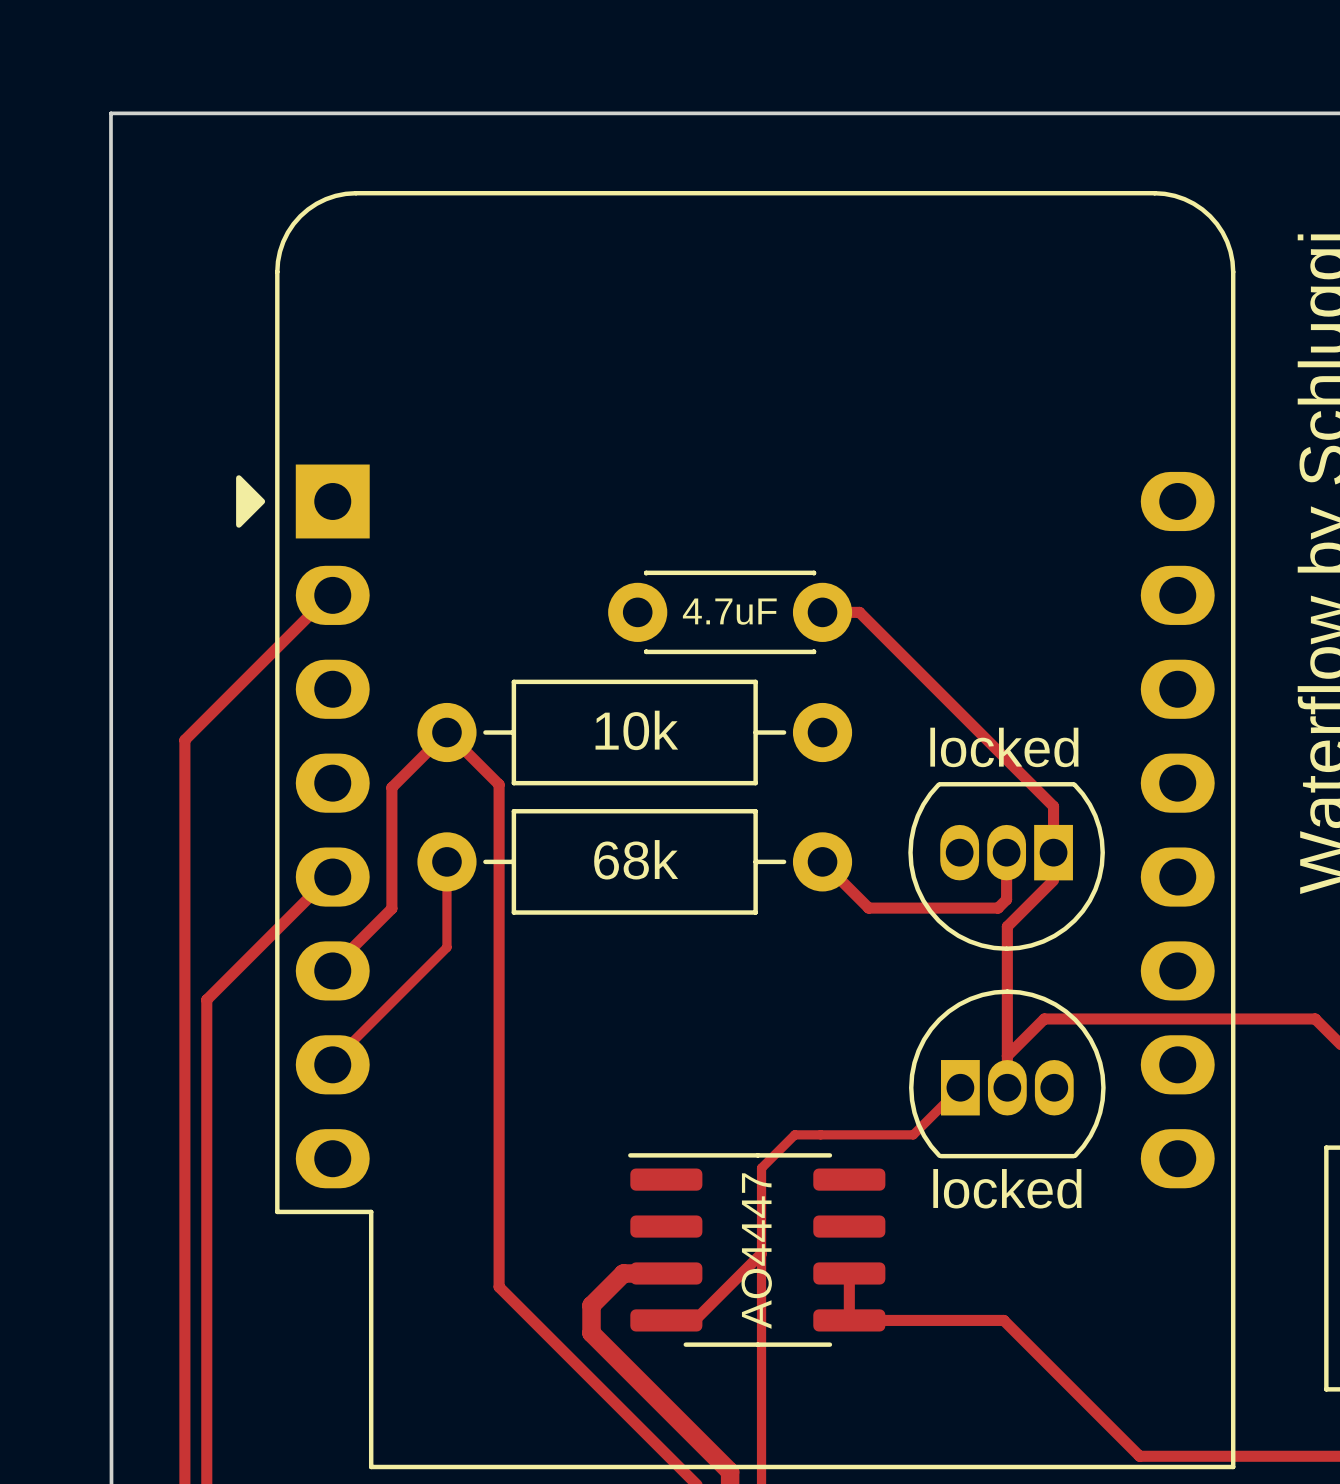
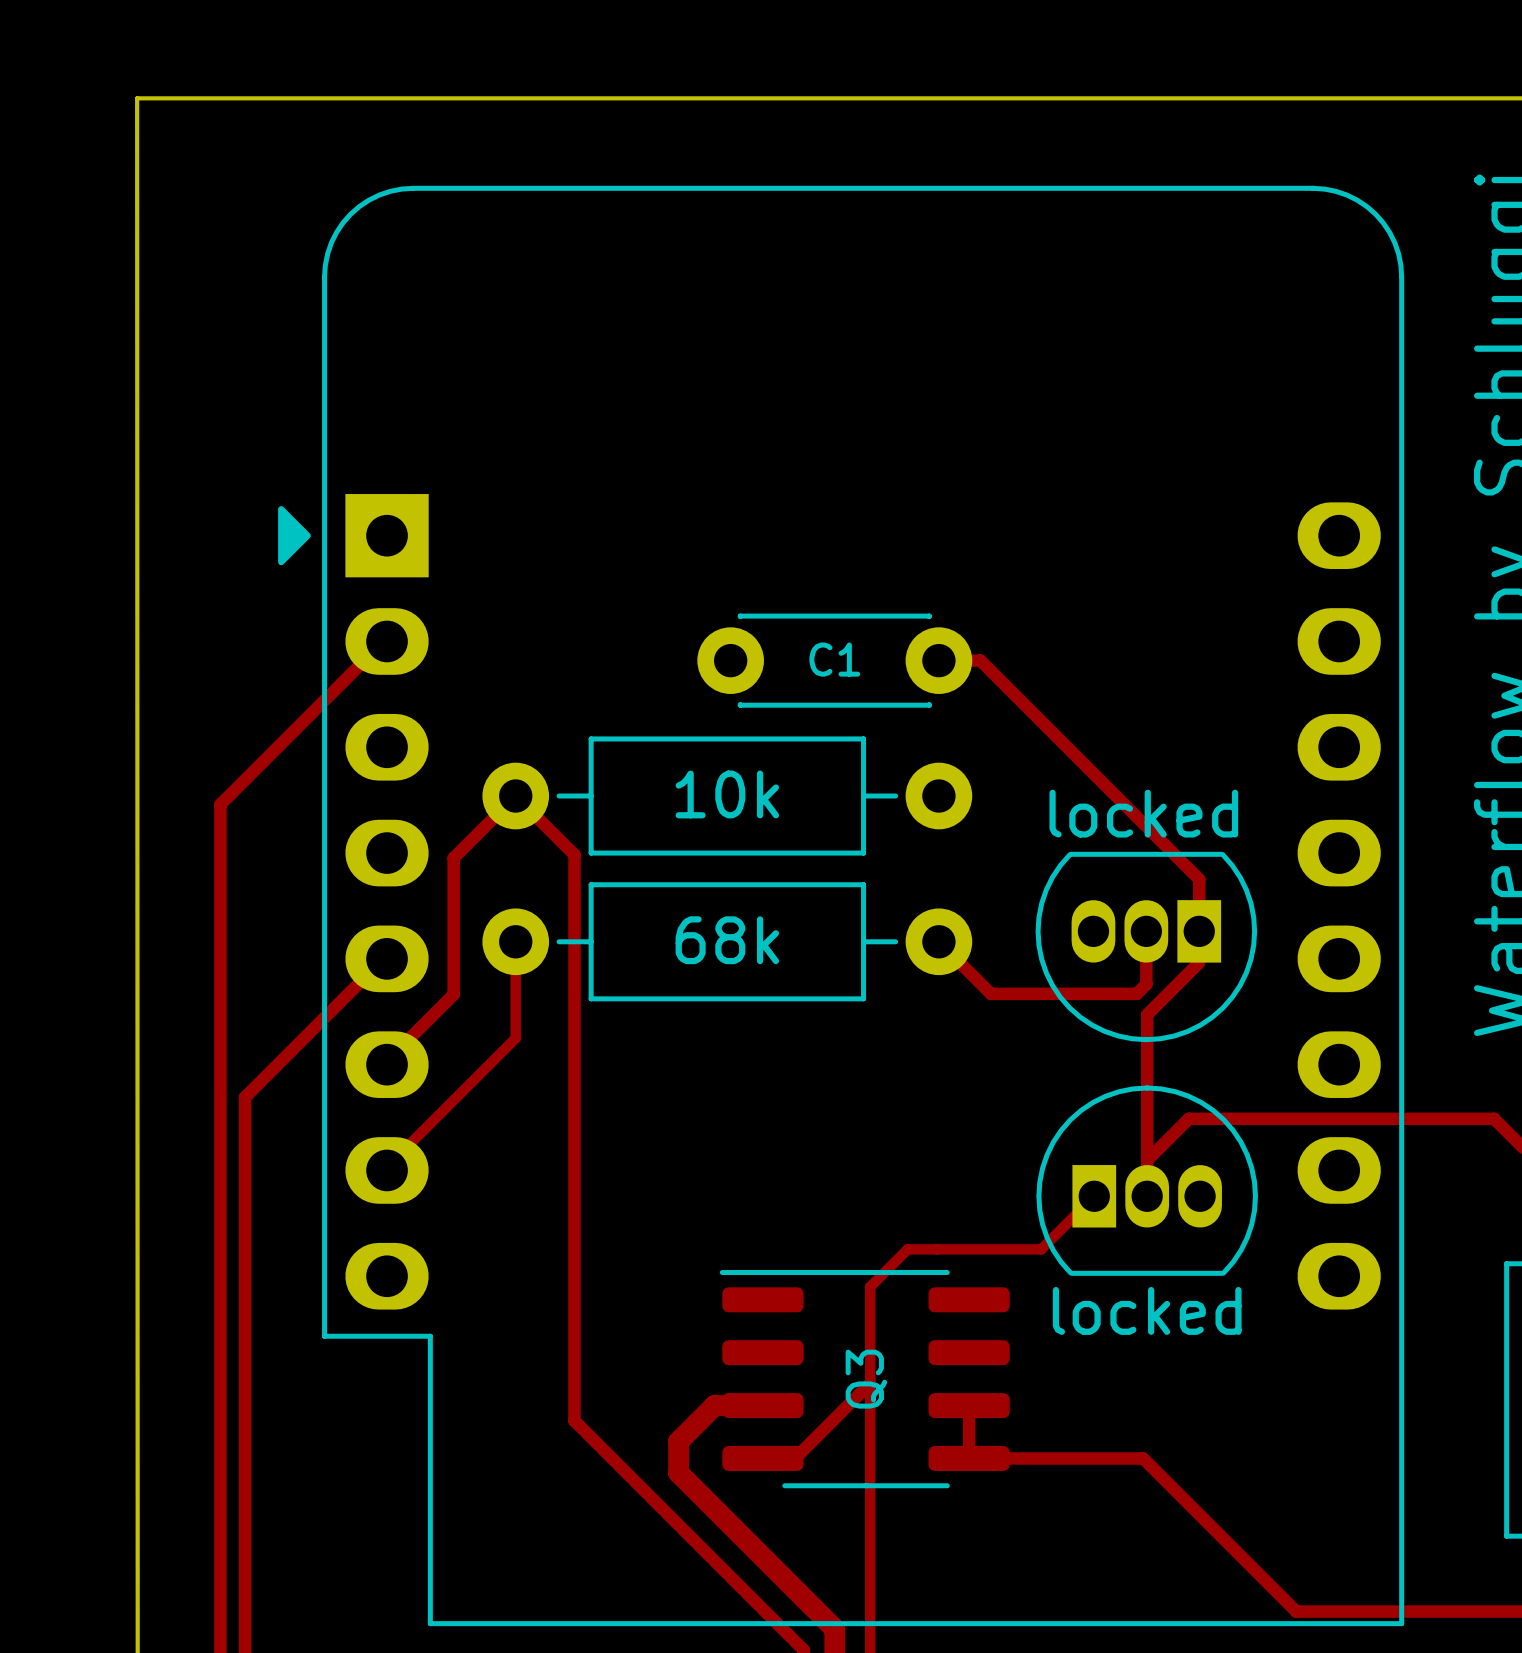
4.7uF name: 4.7uF (729, 611) -> C1 (834, 659)
AO4447 name: AO4447 (756, 1251) -> Q3 (866, 1379)

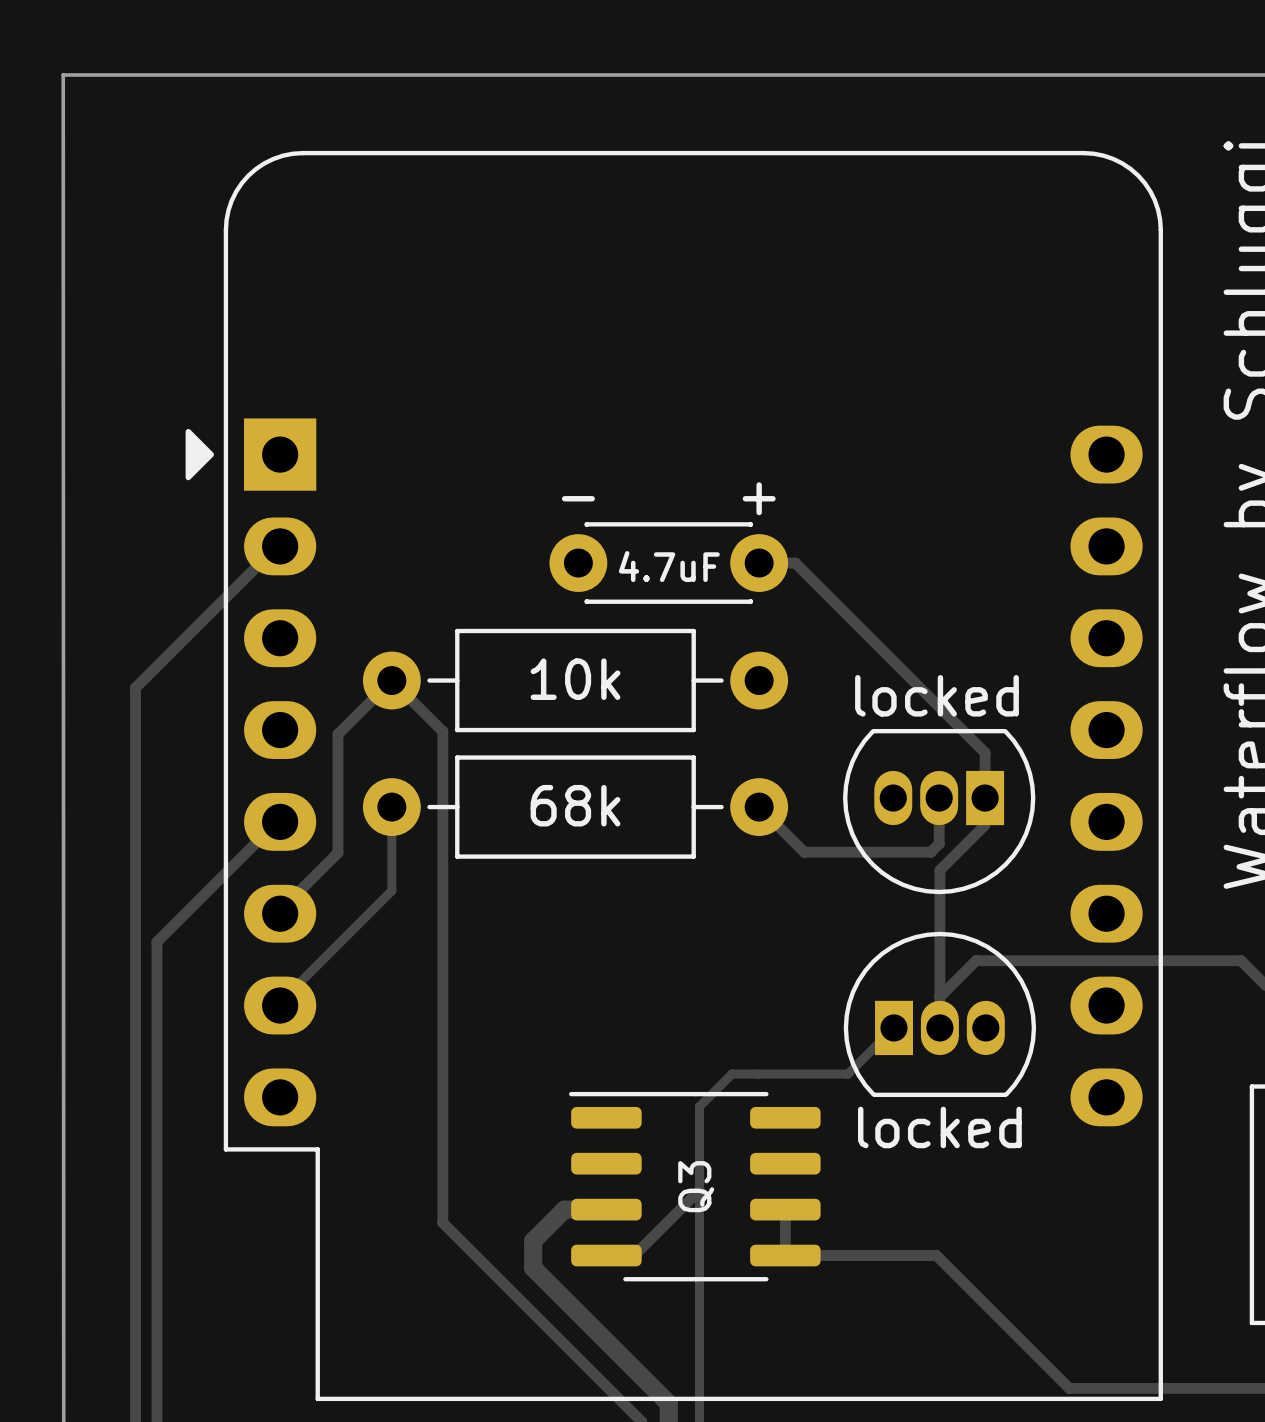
text: none -> - (578, 498)
text: none -> + (759, 498)
C1 name: C1 (834, 659) -> none
C1 value: none -> 4.7uF (669, 566)

